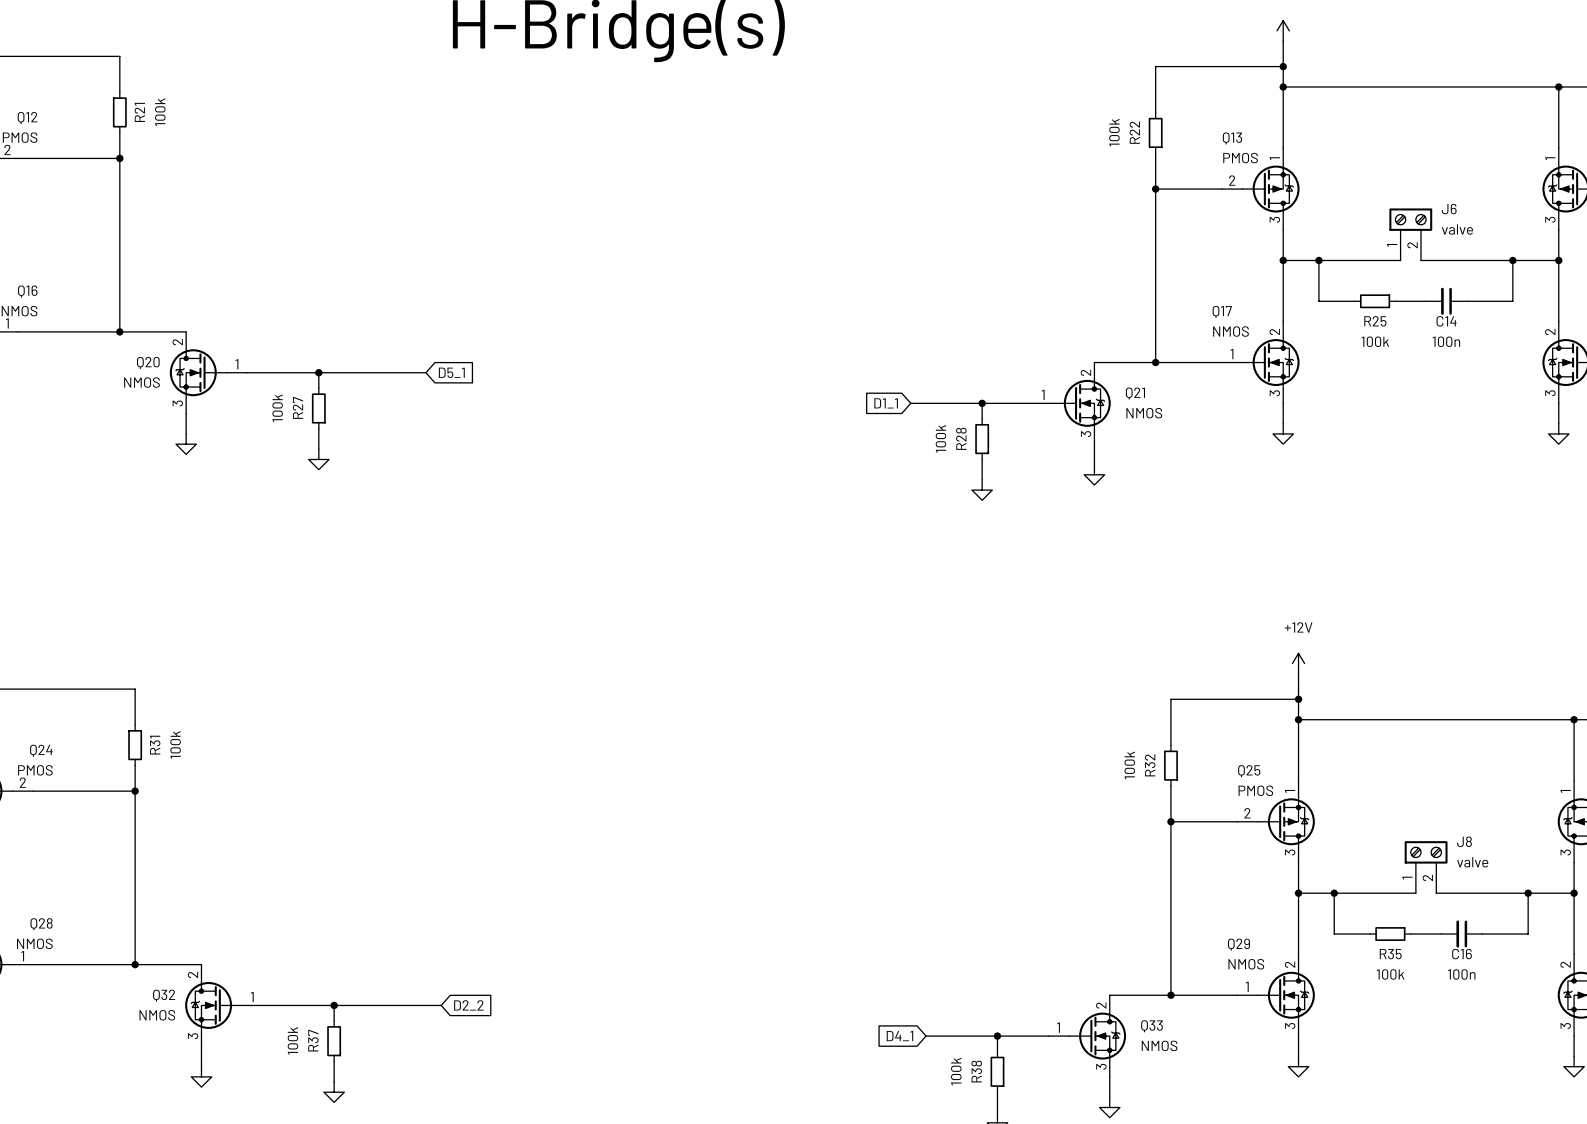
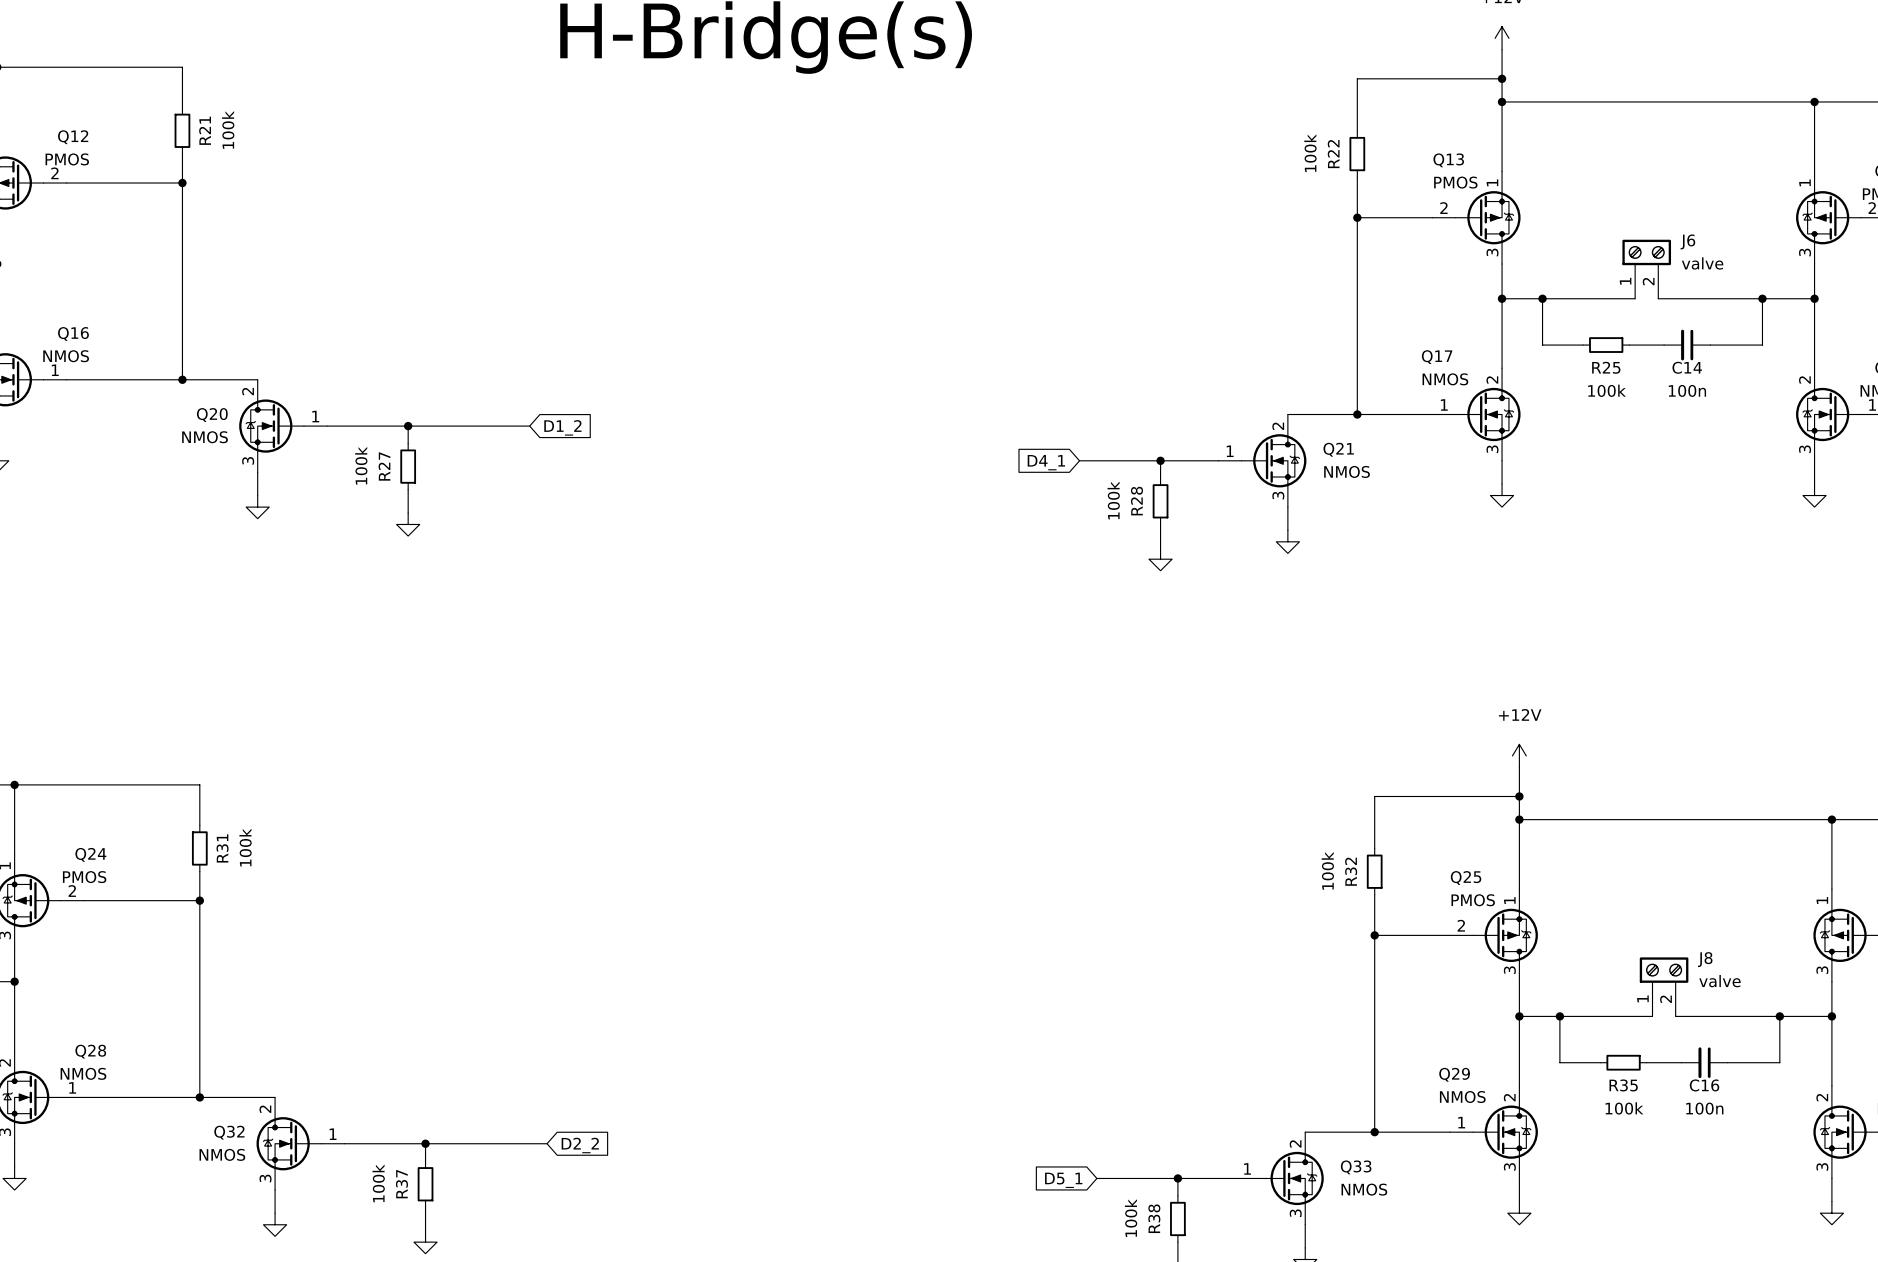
global label: D5_1 (451, 372) -> D1_2 (562, 427)
global label: D1_1 (886, 403) -> D4_1 (1046, 462)
global label: D4_1 (899, 1036) -> D5_1 (1063, 1180)

